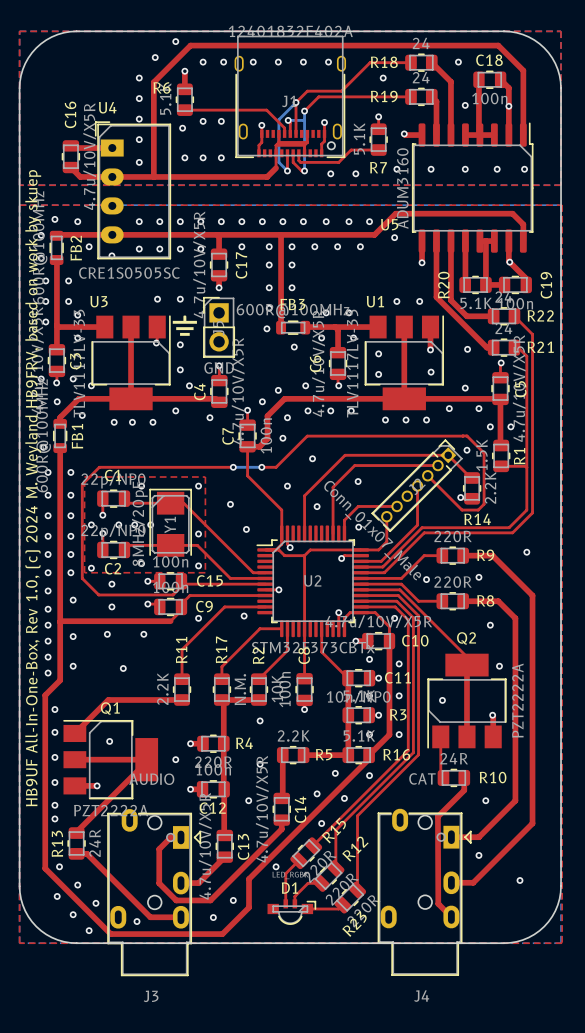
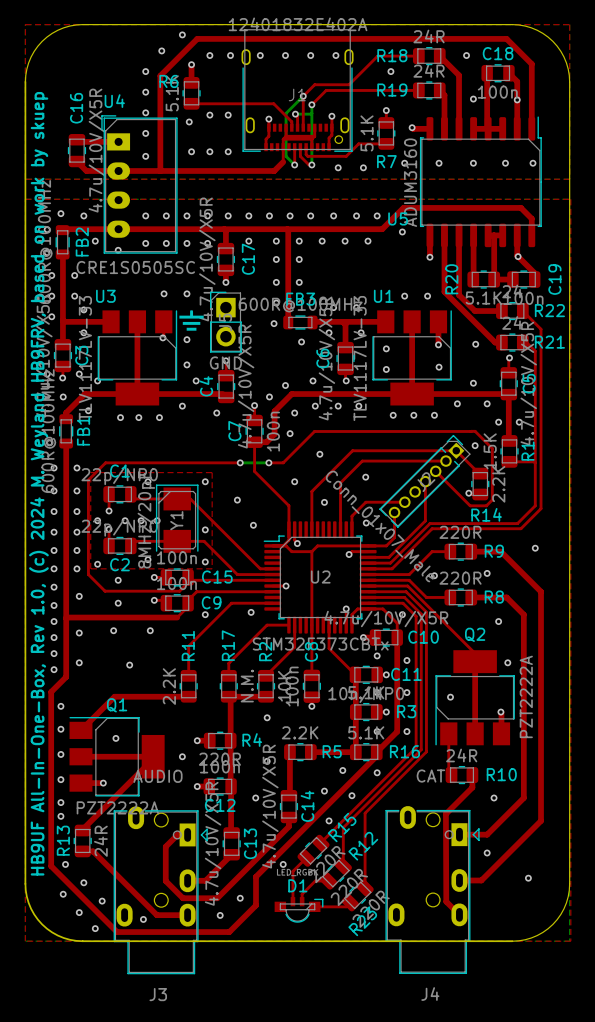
R18 value: 24 (421, 43) -> 24R (429, 36)
R19 value: 24 (421, 77) -> 24R (429, 70)

